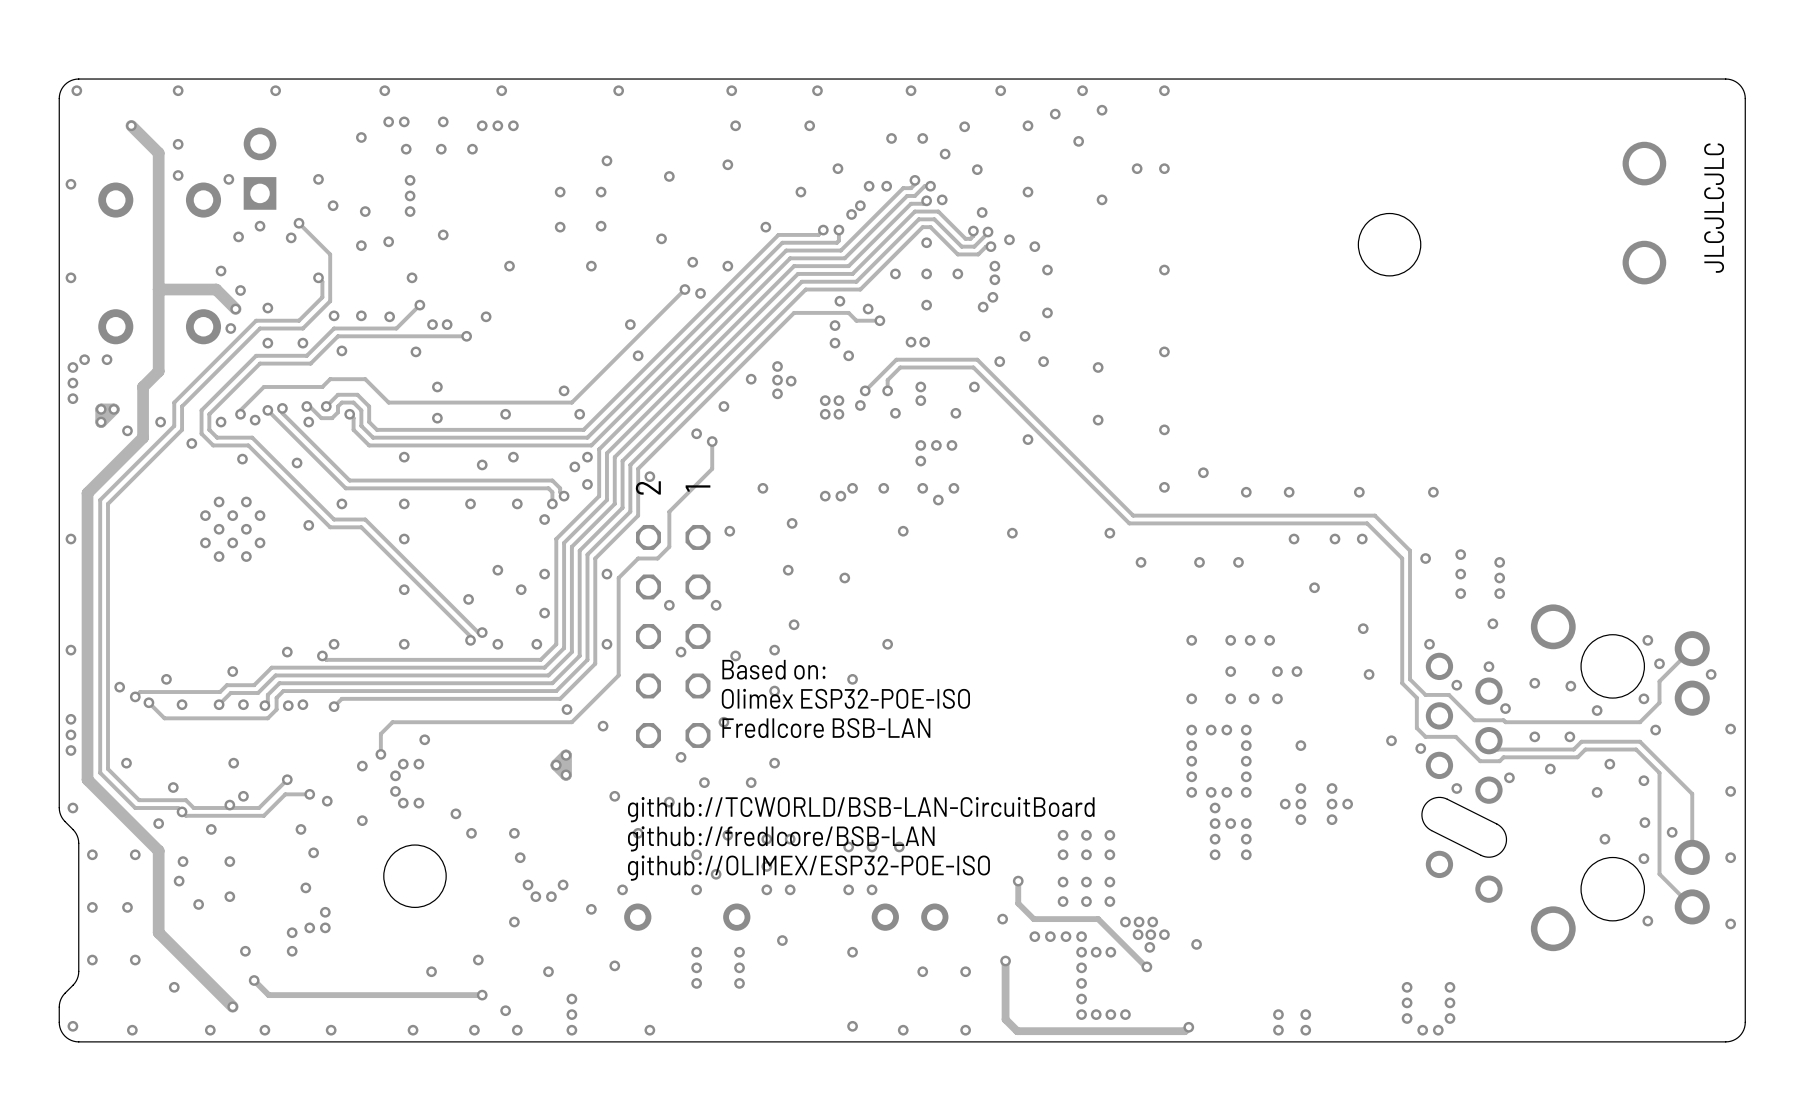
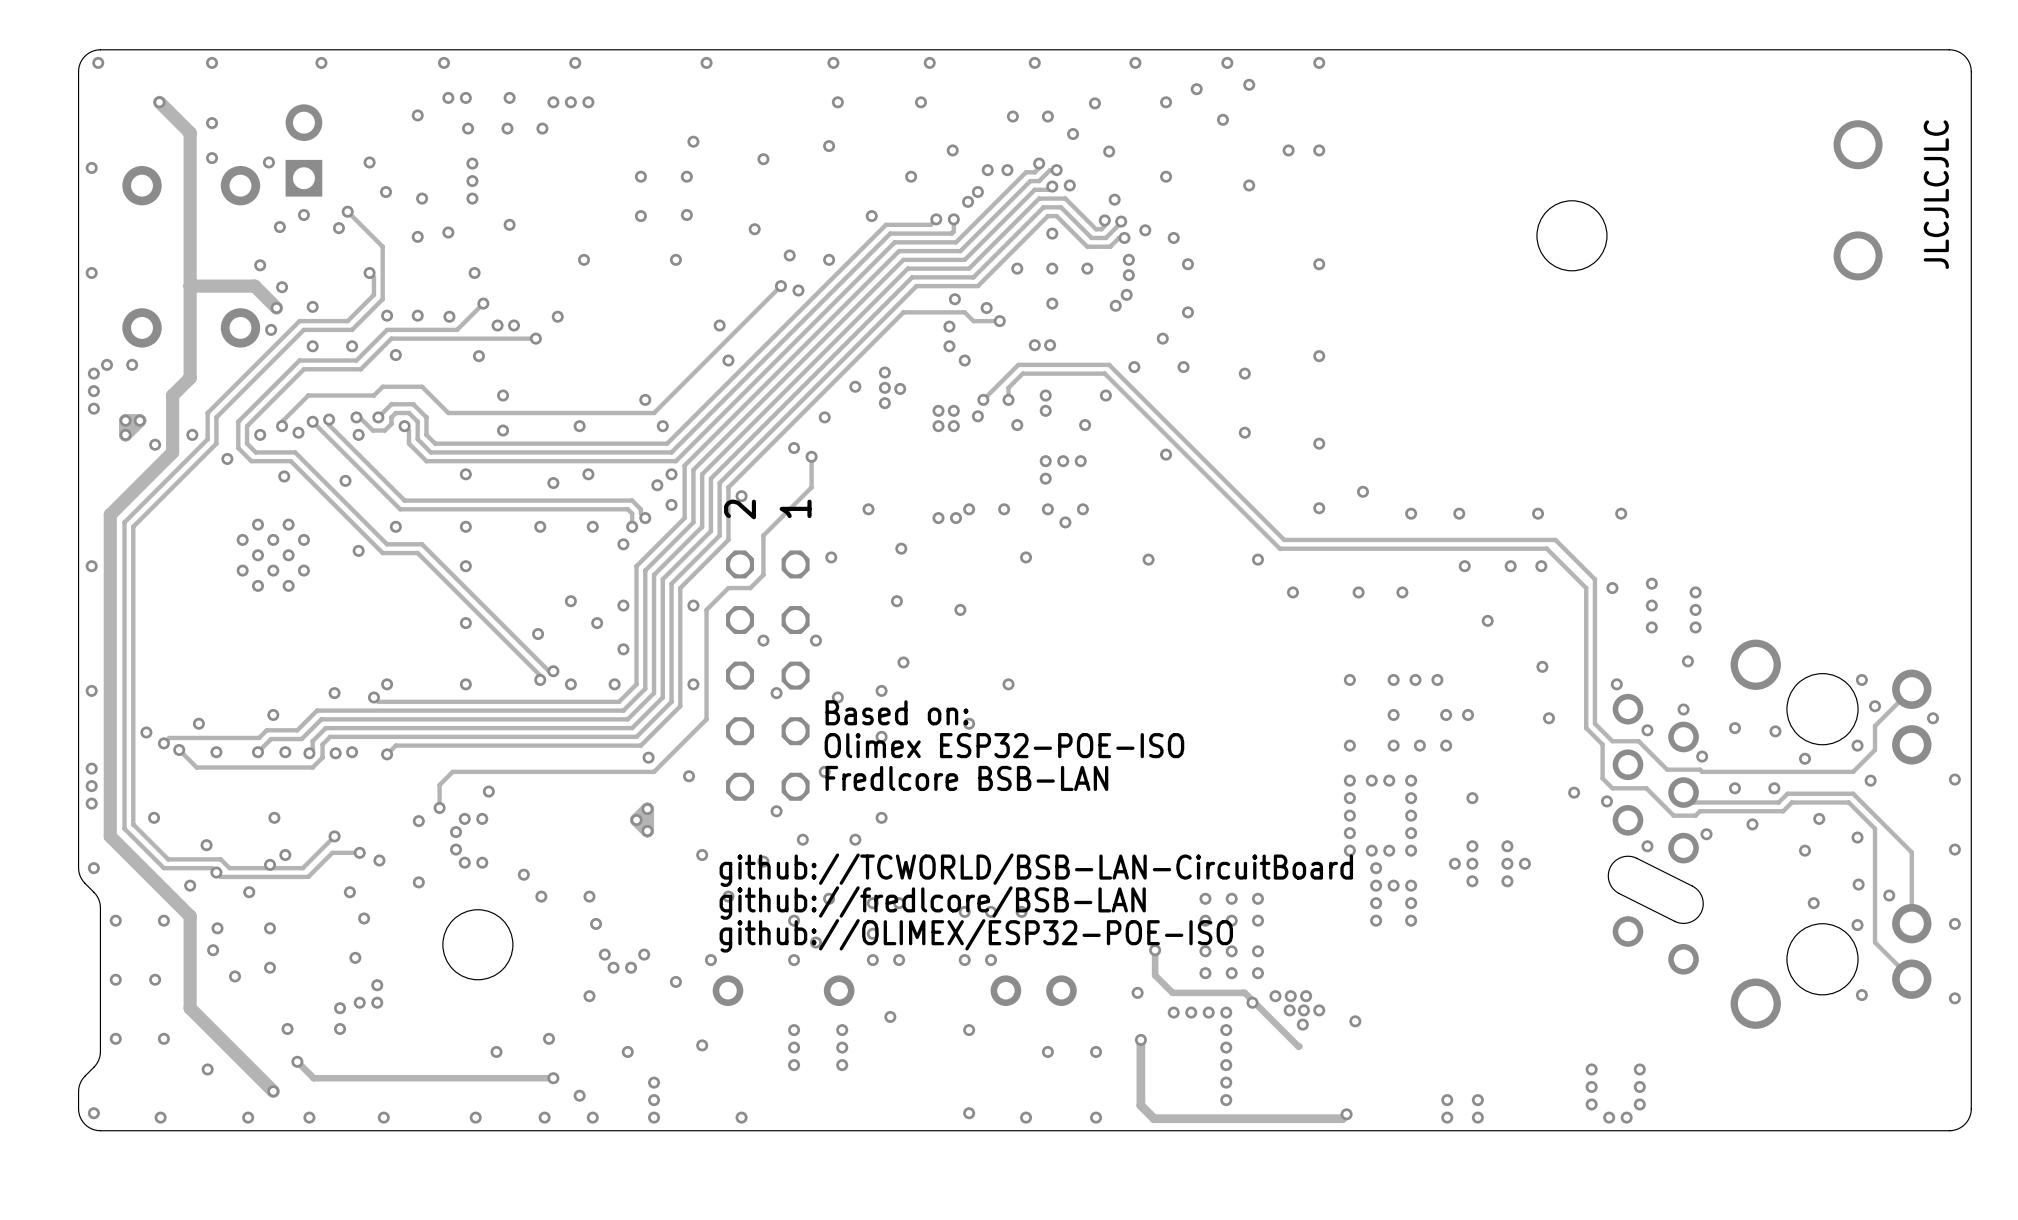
via: none -> (1252, 1002)
via: (1096, 952) -> none
via: (1110, 952) -> none
via: (1146, 966) -> none
via: (1096, 1014) -> none
via: (1110, 1014) -> none
via: (1125, 1014) -> none

